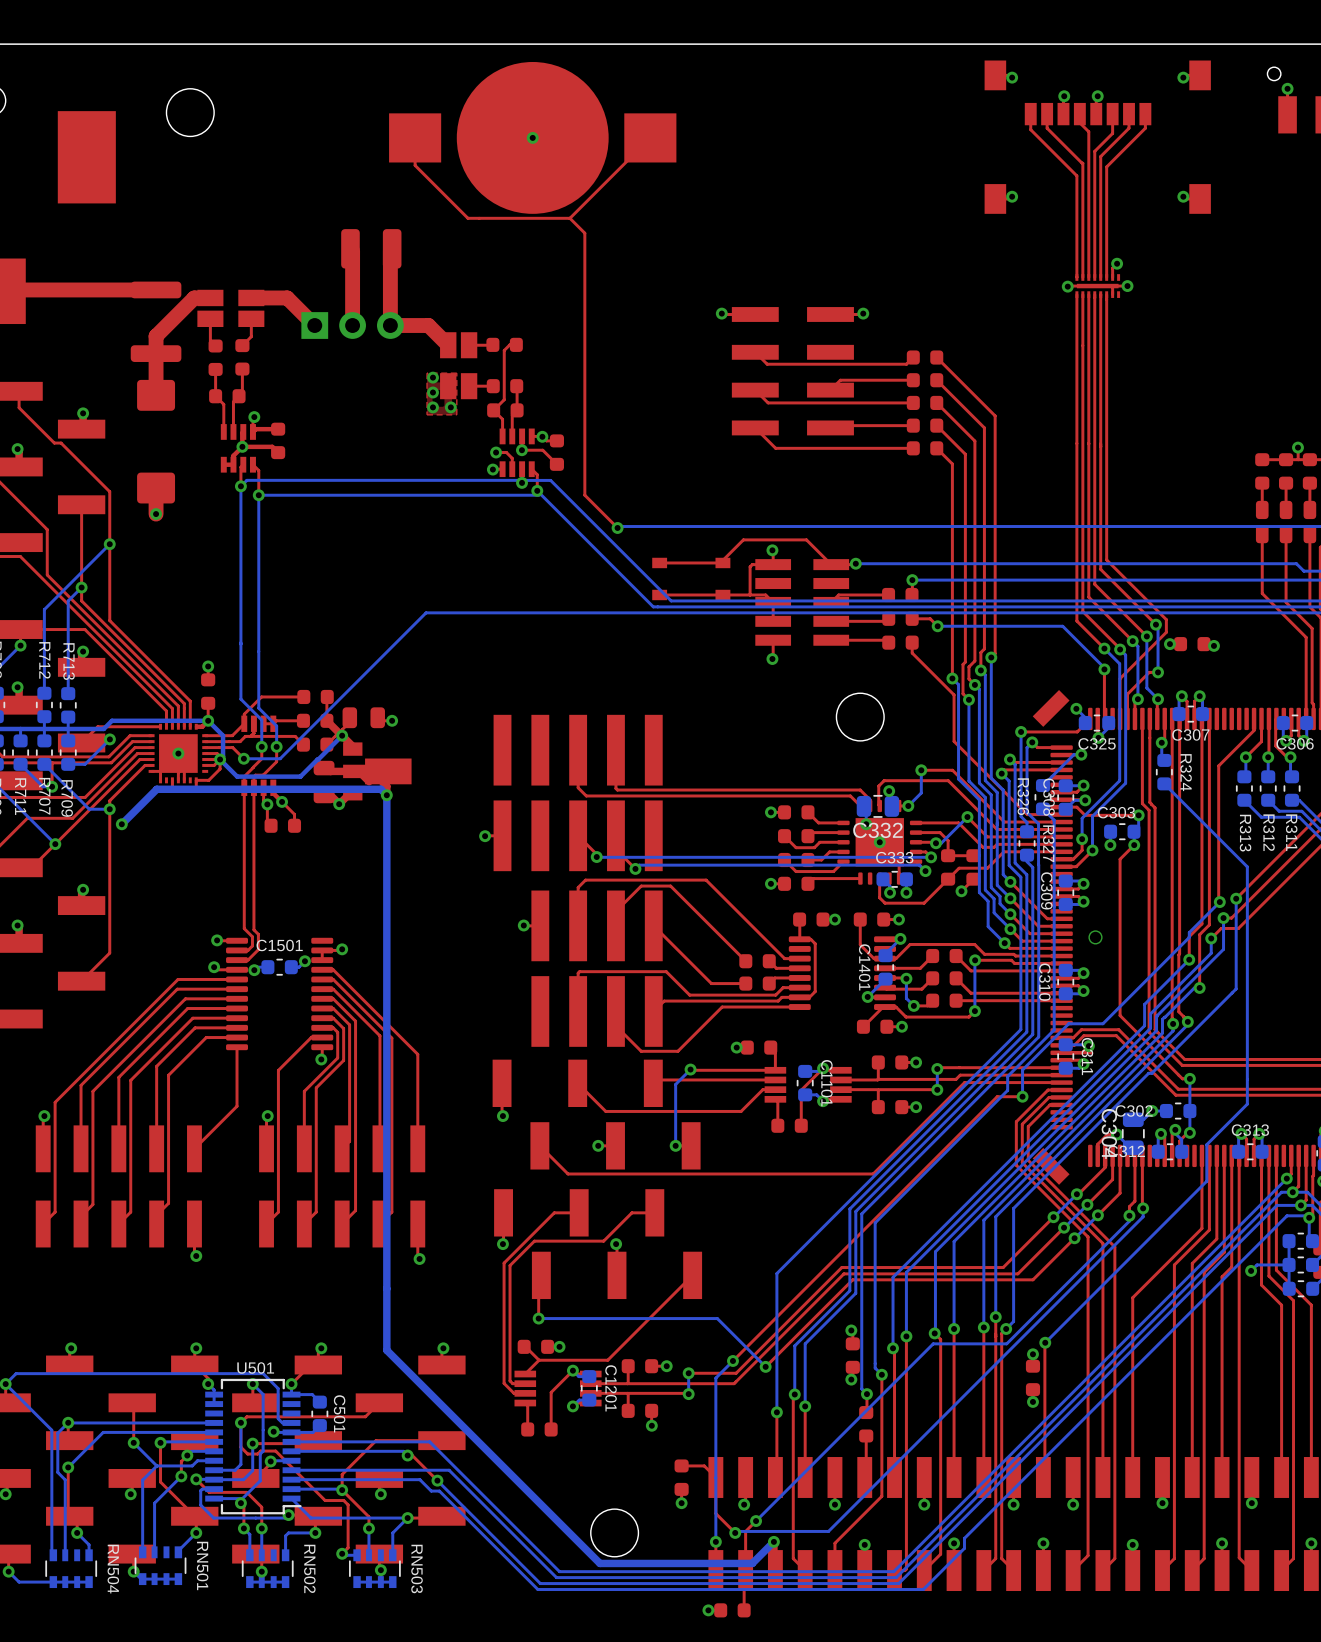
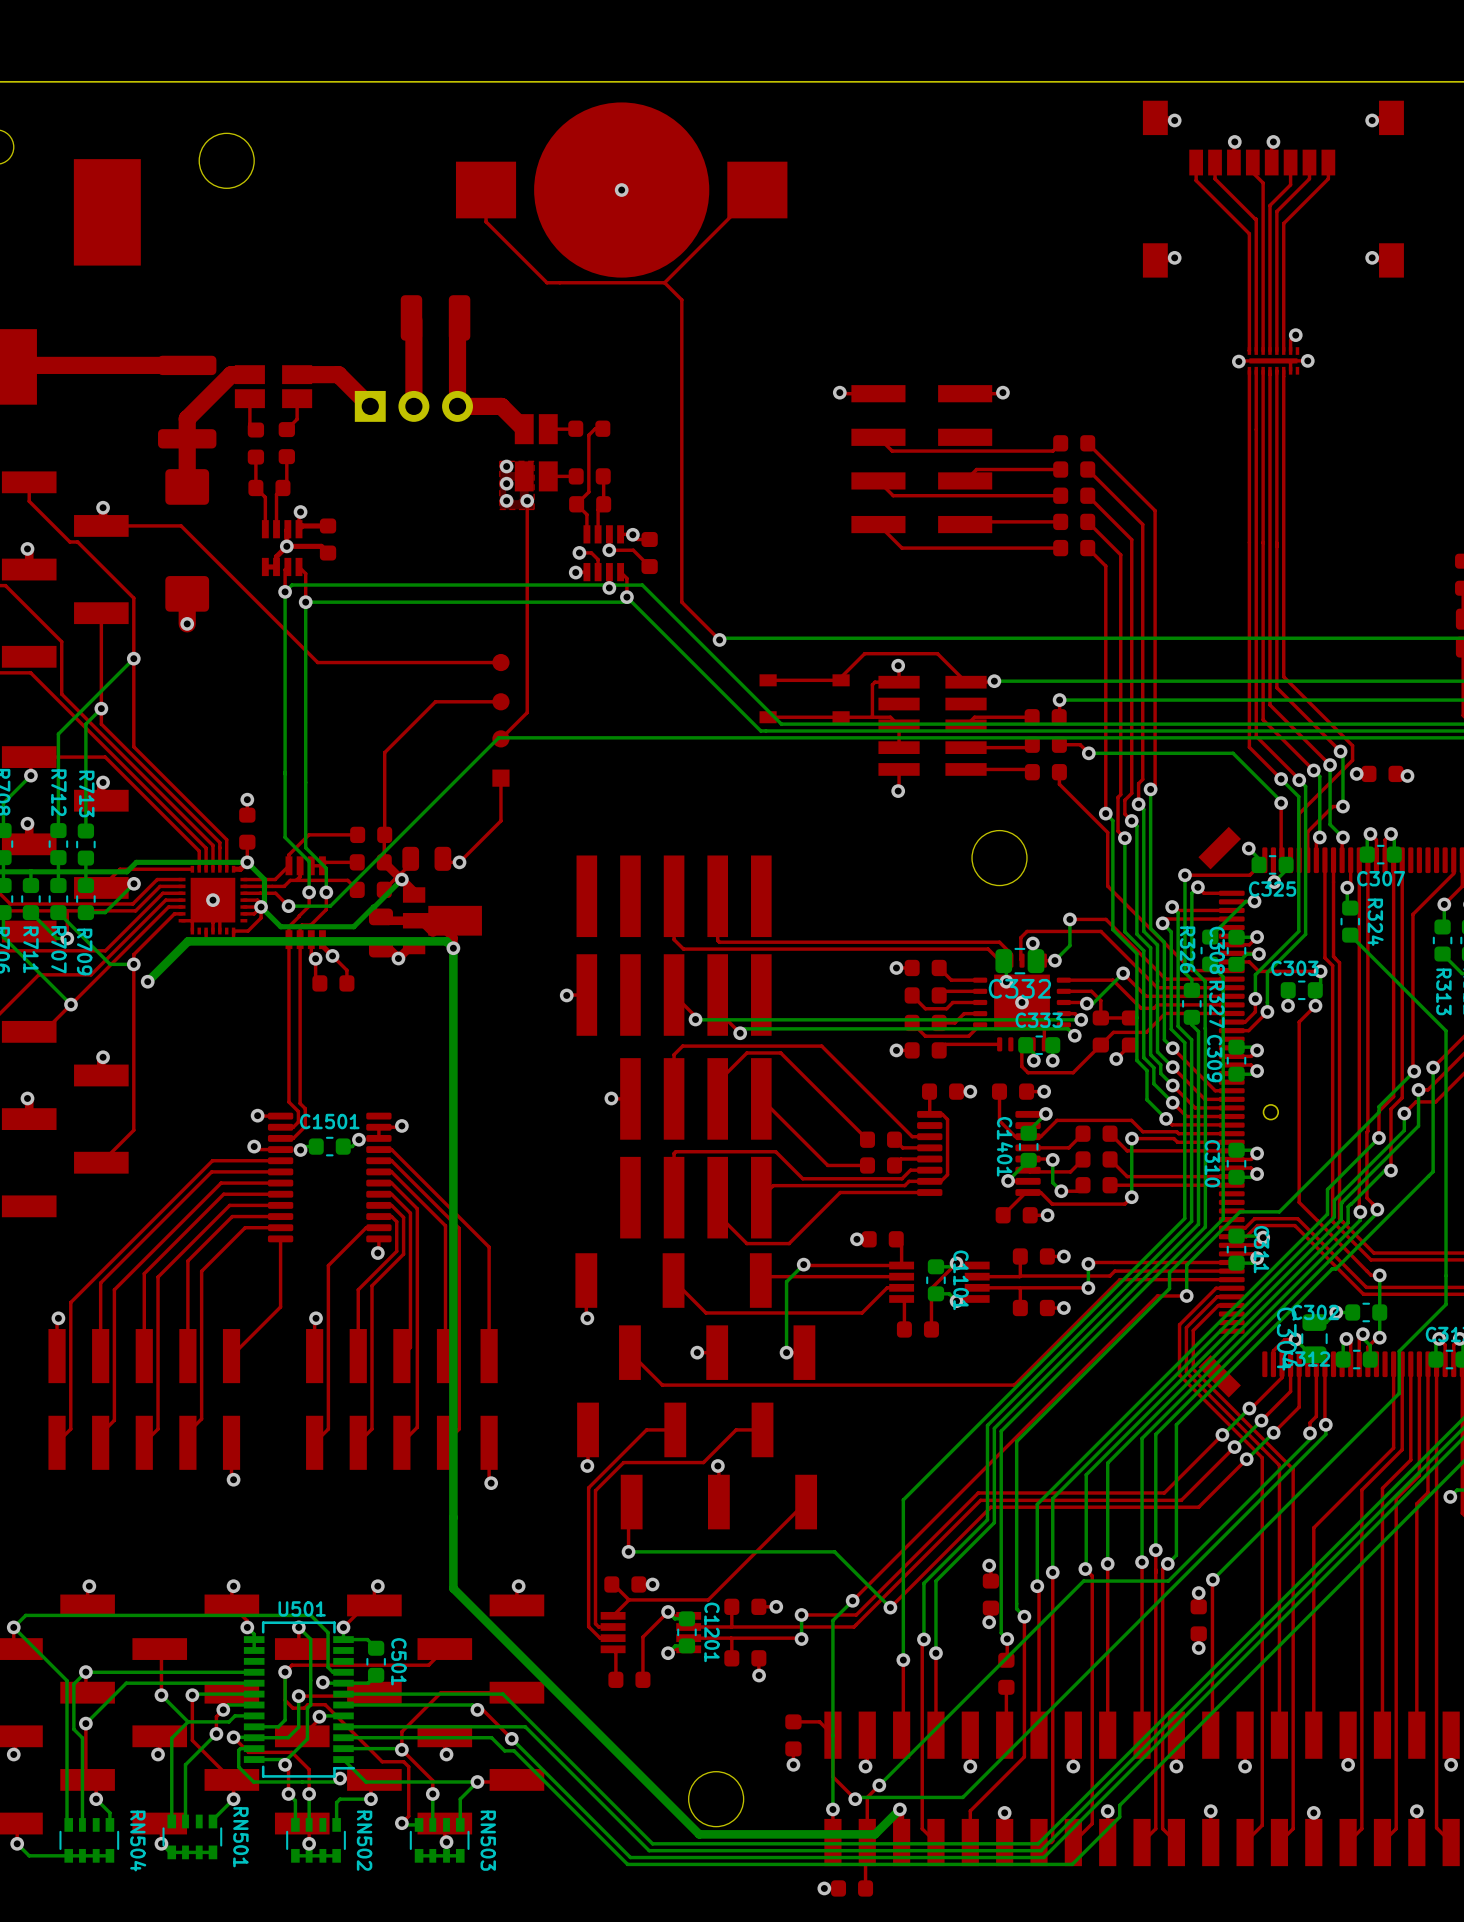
top track: none -> (527, 500) (527, 712) (500, 738)
top track: none -> (101, 525) (181, 525) (317, 662) (500, 662)
part: none -> (500, 662)
top track: none -> (500, 701) (435, 701) (384, 752) (384, 834)
part: none -> (500, 701)
part: none -> (500, 738)
top track: none -> (500, 778) (500, 820) (459, 862)
part: none -> (500, 778)

